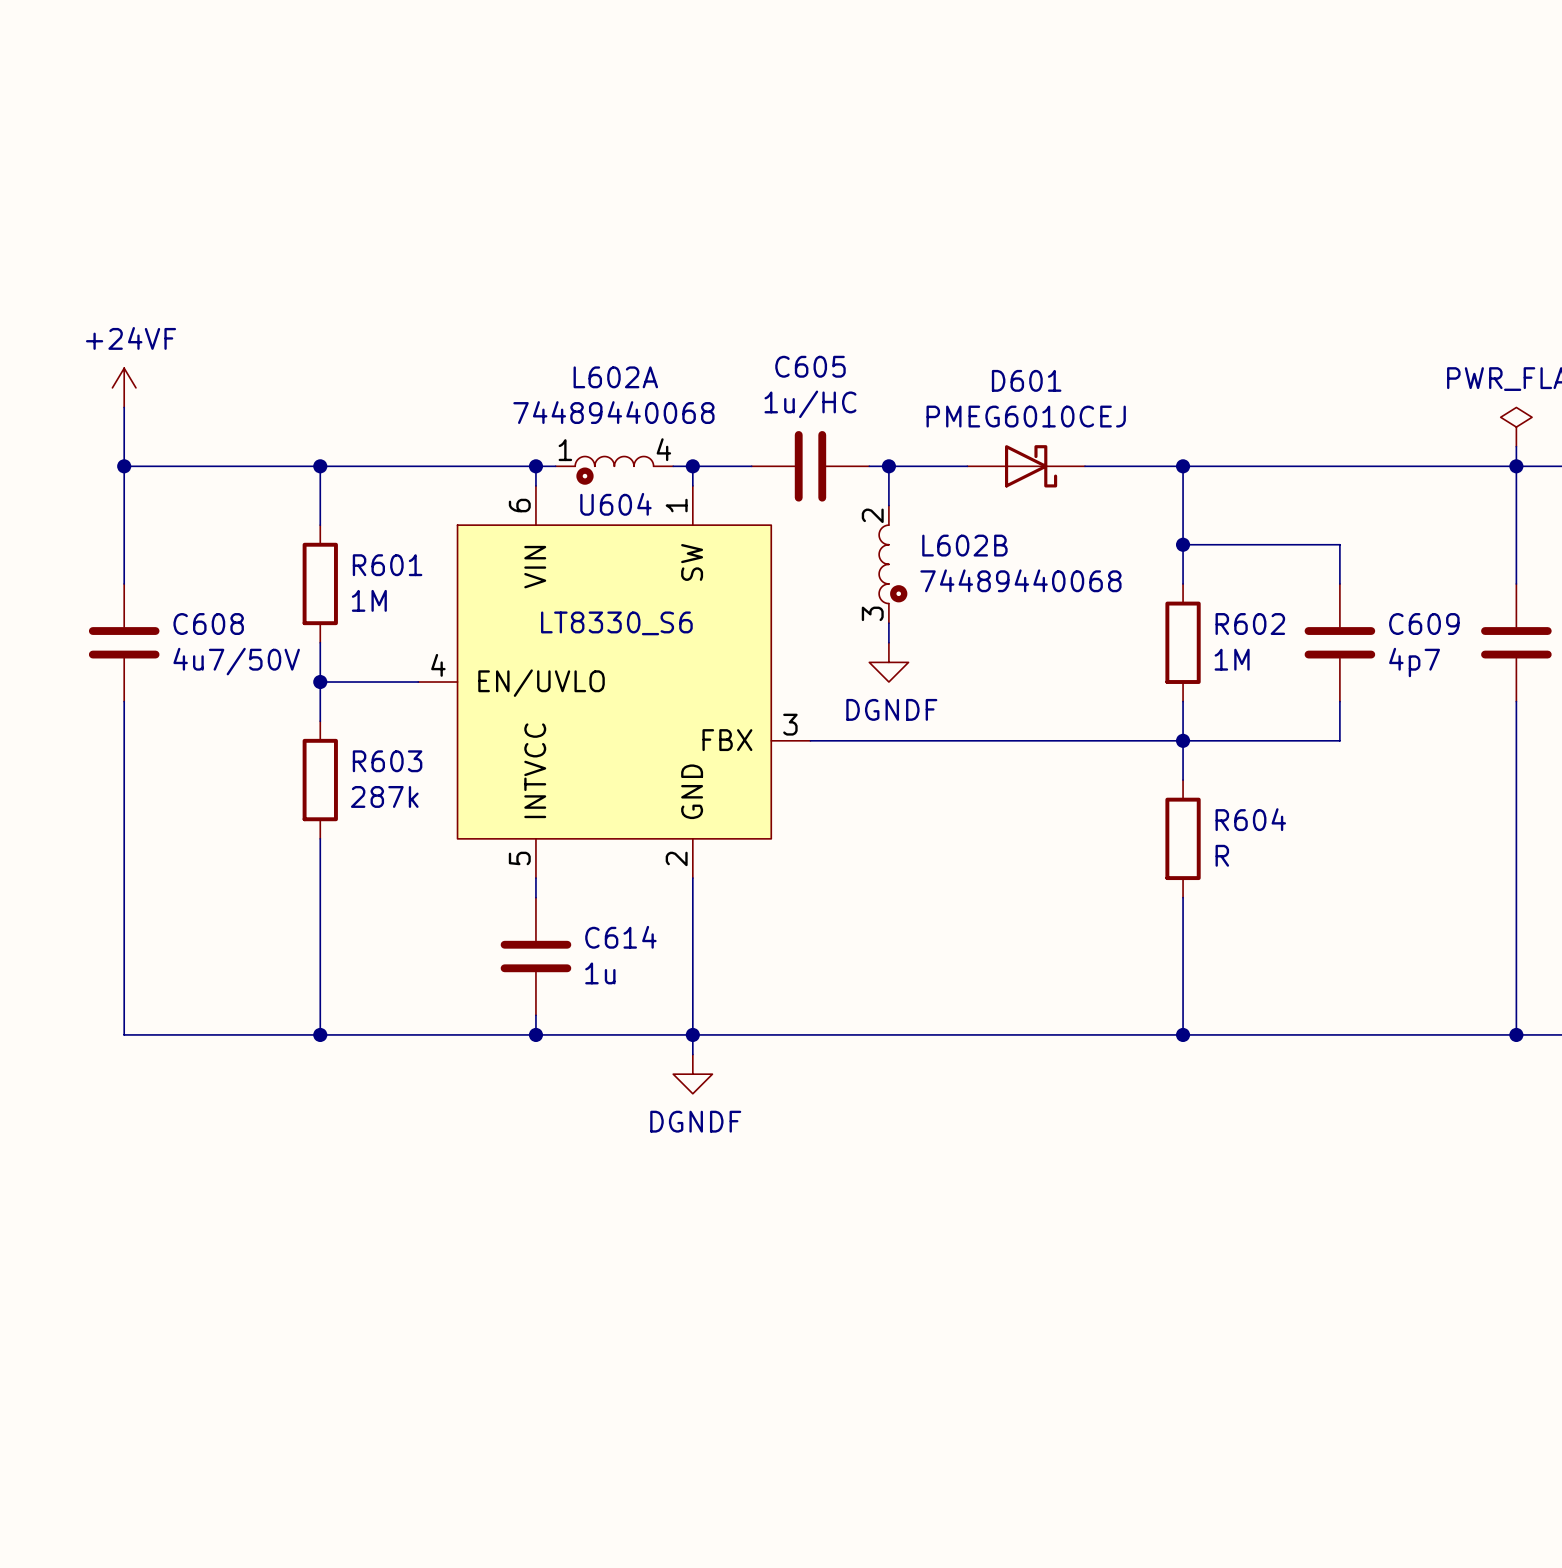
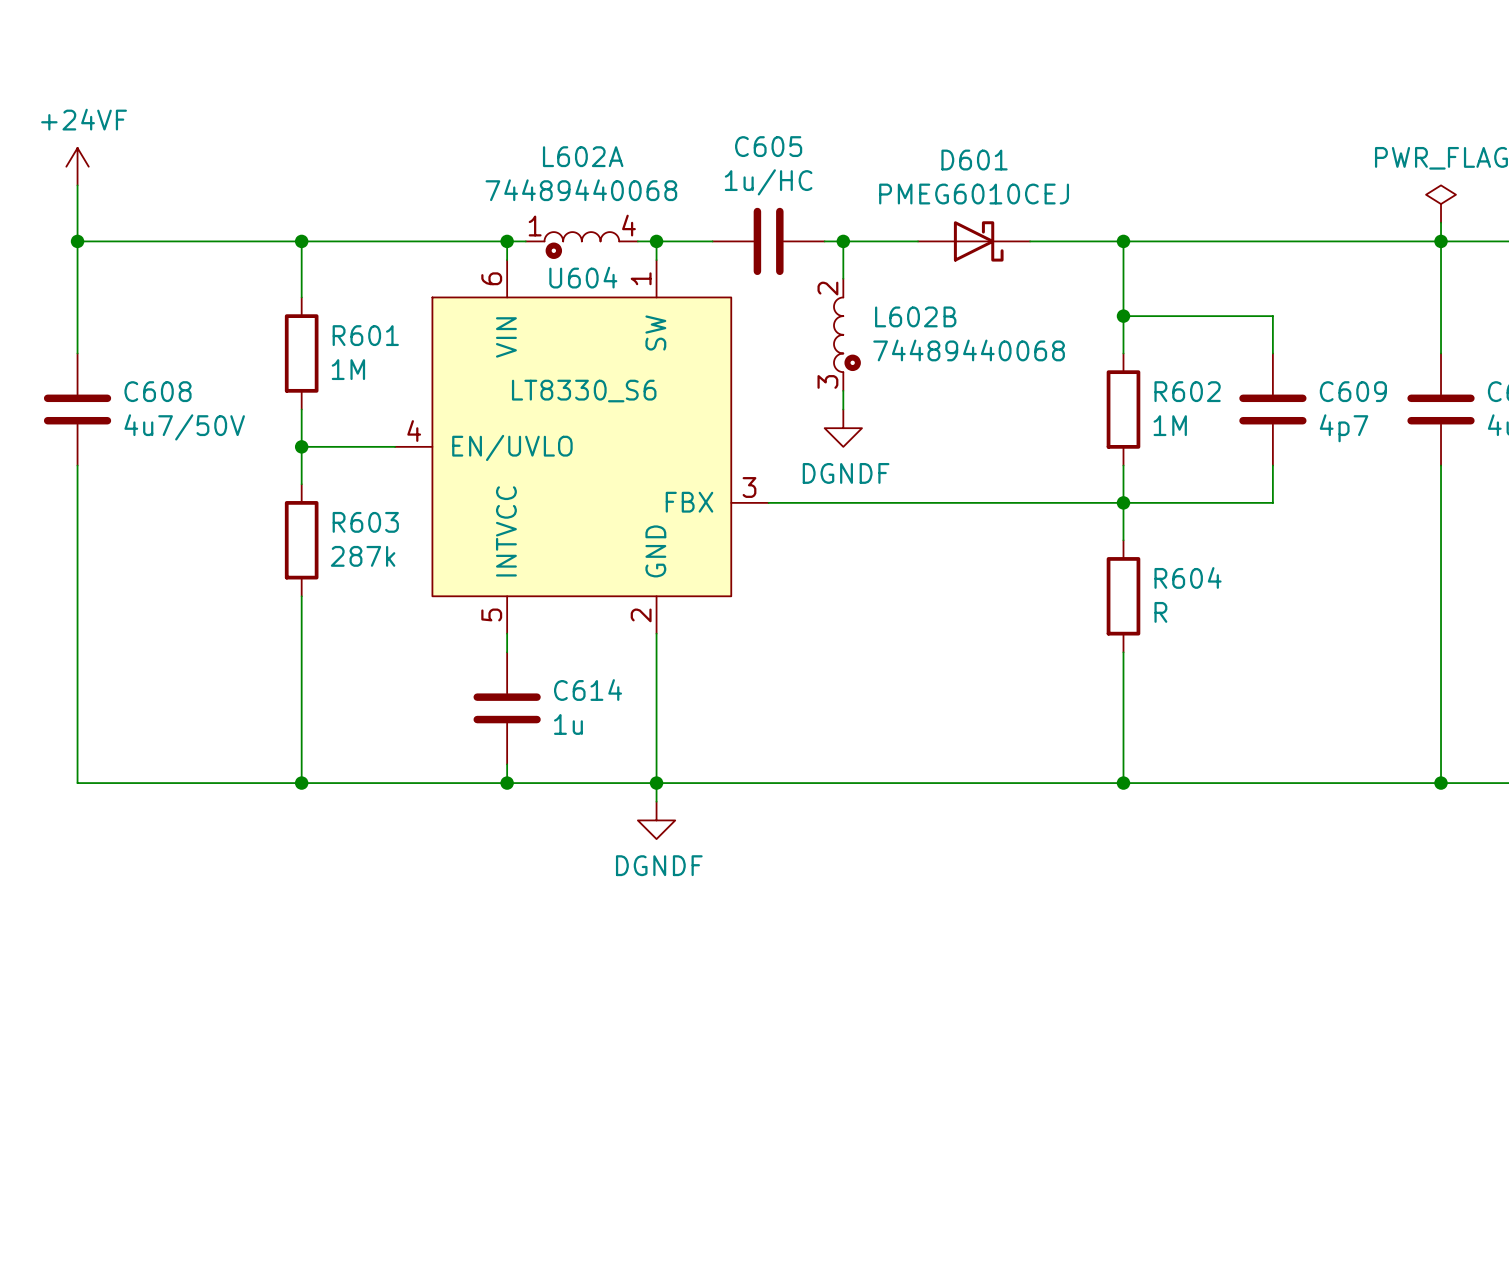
power symbol position: +24VF (124, 387) -> +24VF (77, 166)
wire: (124, 407) (124, 583) -> (77, 185) (77, 353)
wire: none -> (77, 241) (114, 241)
junction position: (124, 466) -> (77, 241)
C608 position: (124, 642) -> (77, 409)
wire: (124, 701) (124, 1034) -> (77, 465) (77, 783) (114, 783)

